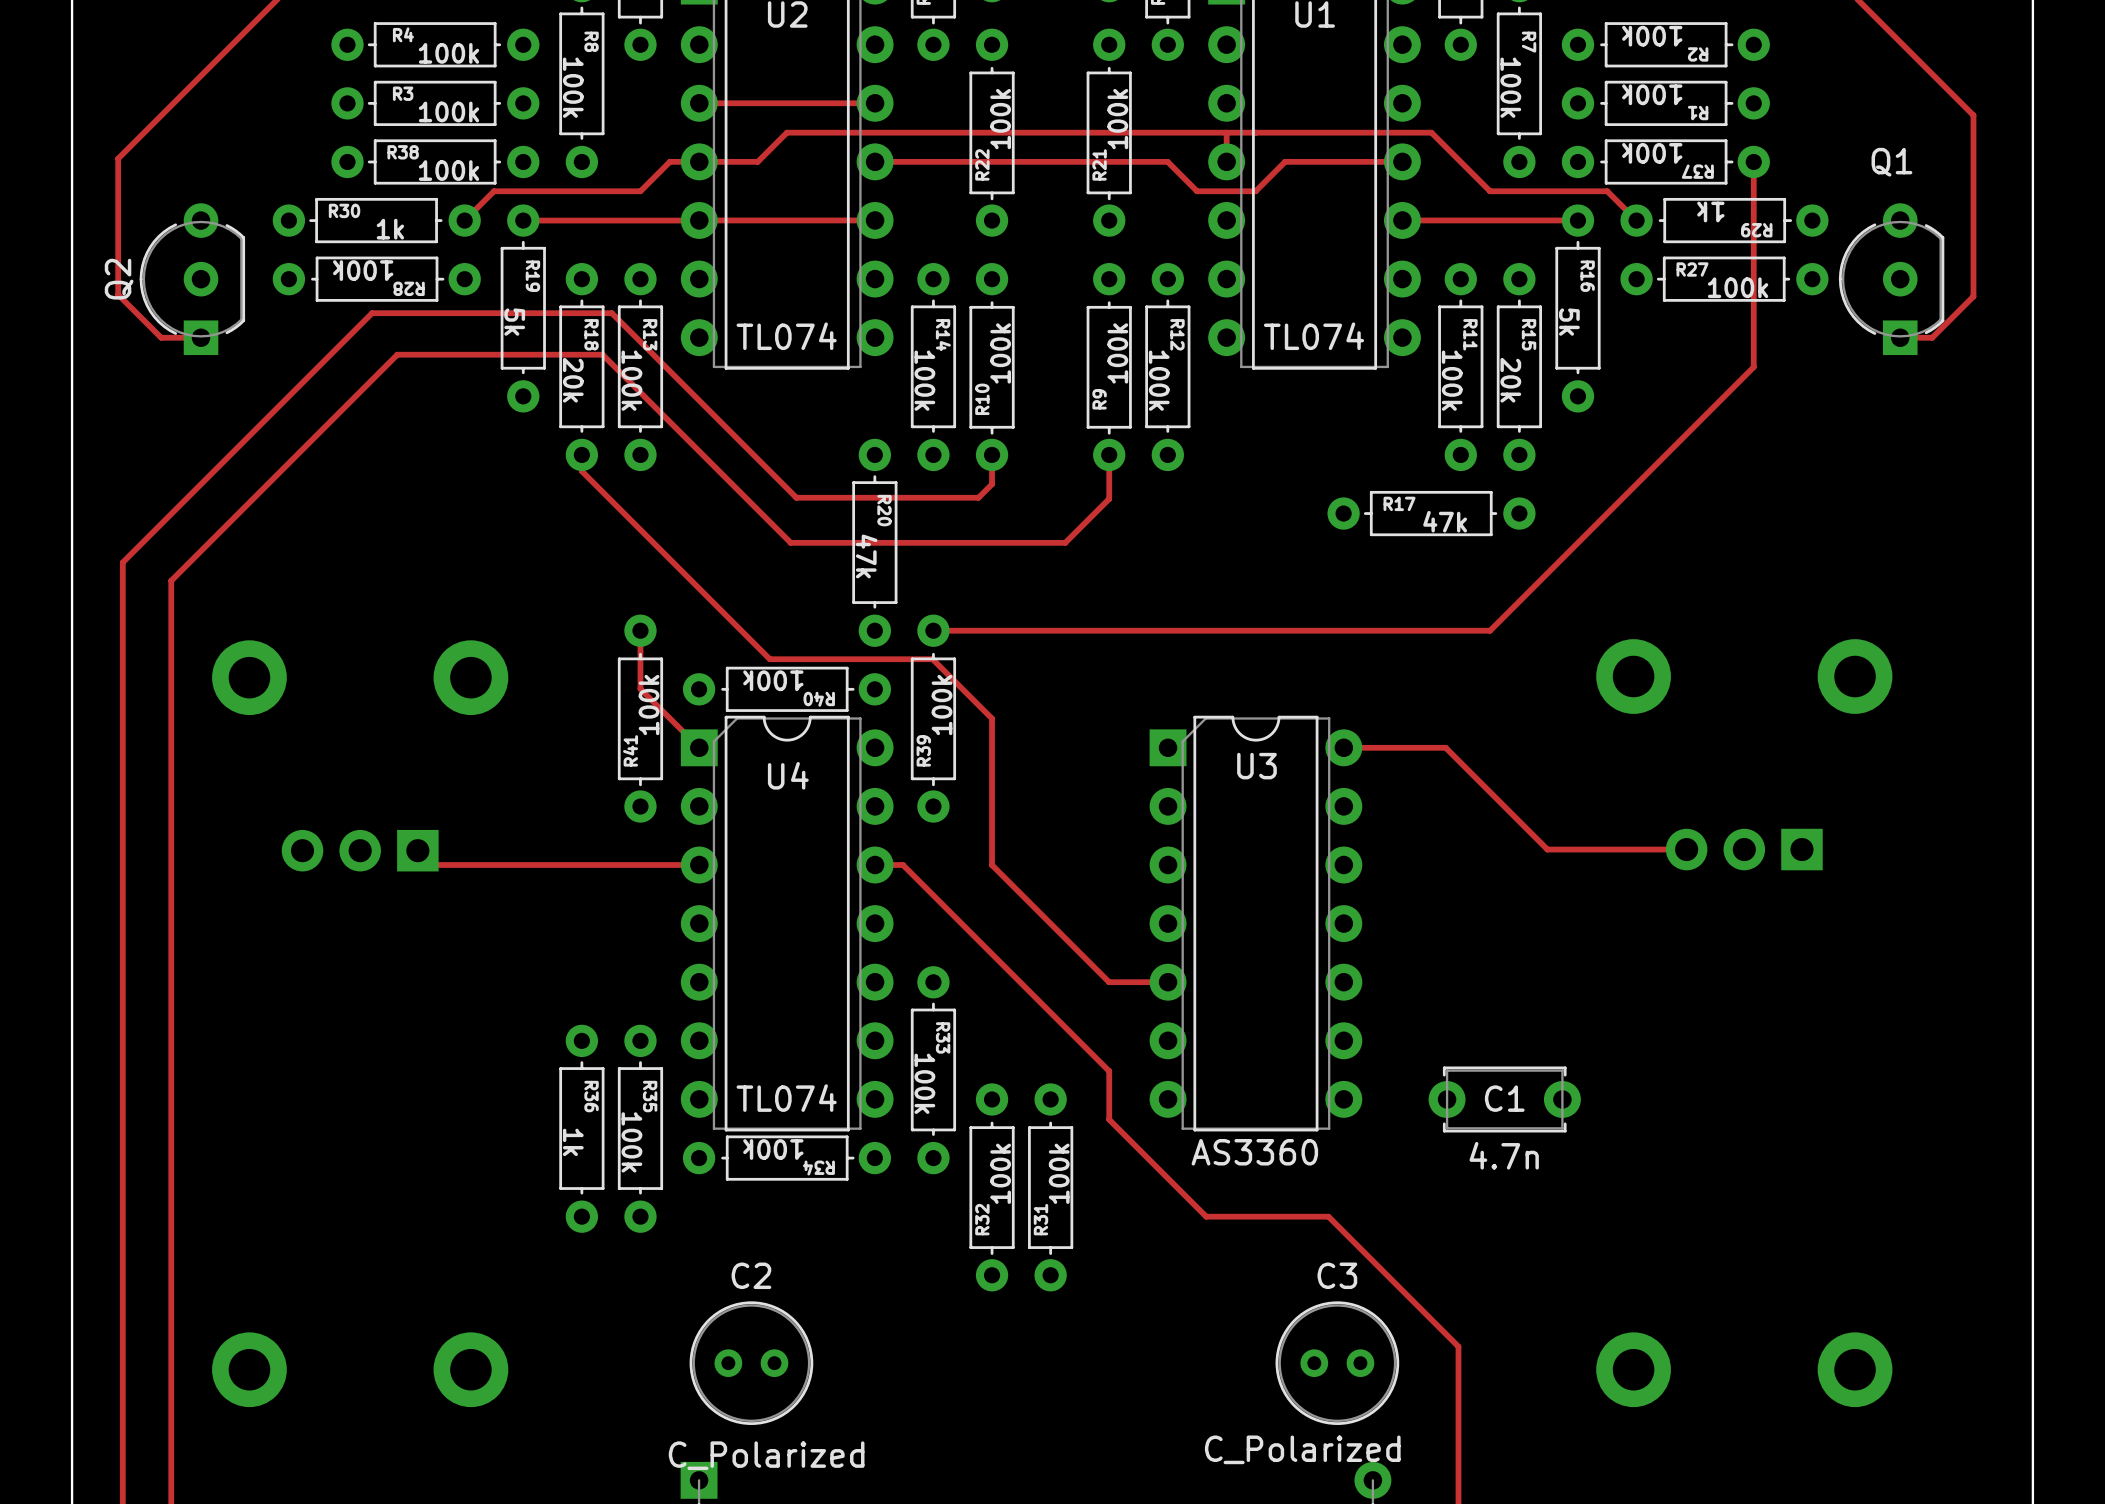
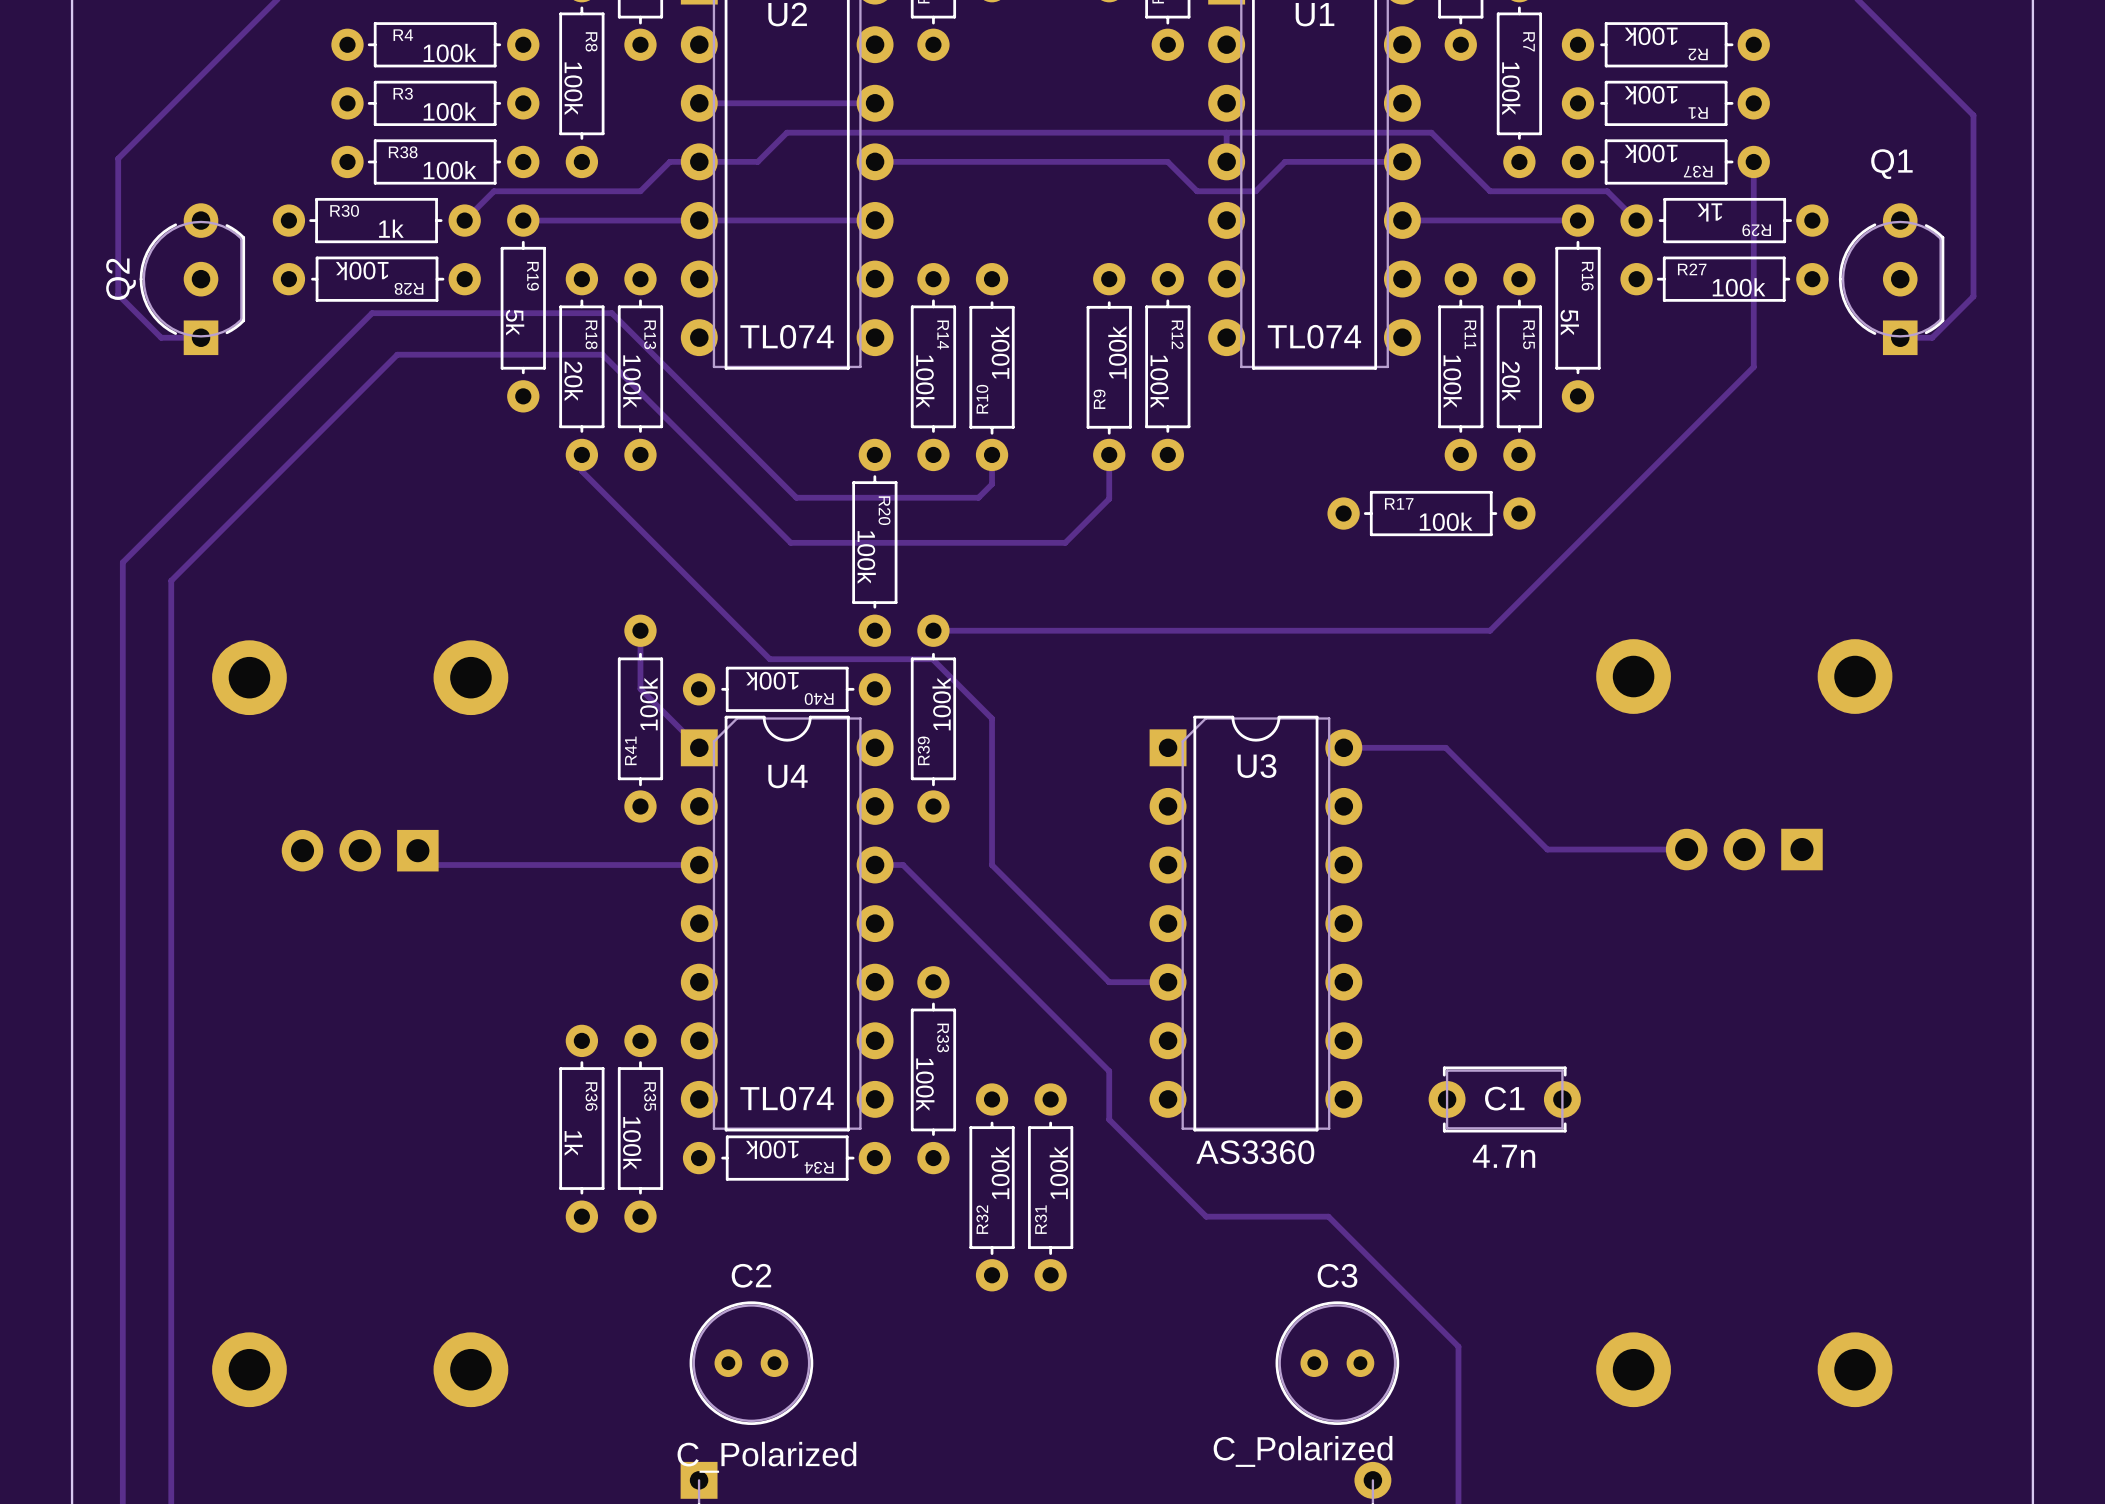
R22: 100k (992, 132) -> none
R21: 100k (1109, 132) -> none
R17 value: 47k (1445, 521) -> 100k (1446, 521)
R20 value: 47k (866, 556) -> 100k (866, 557)

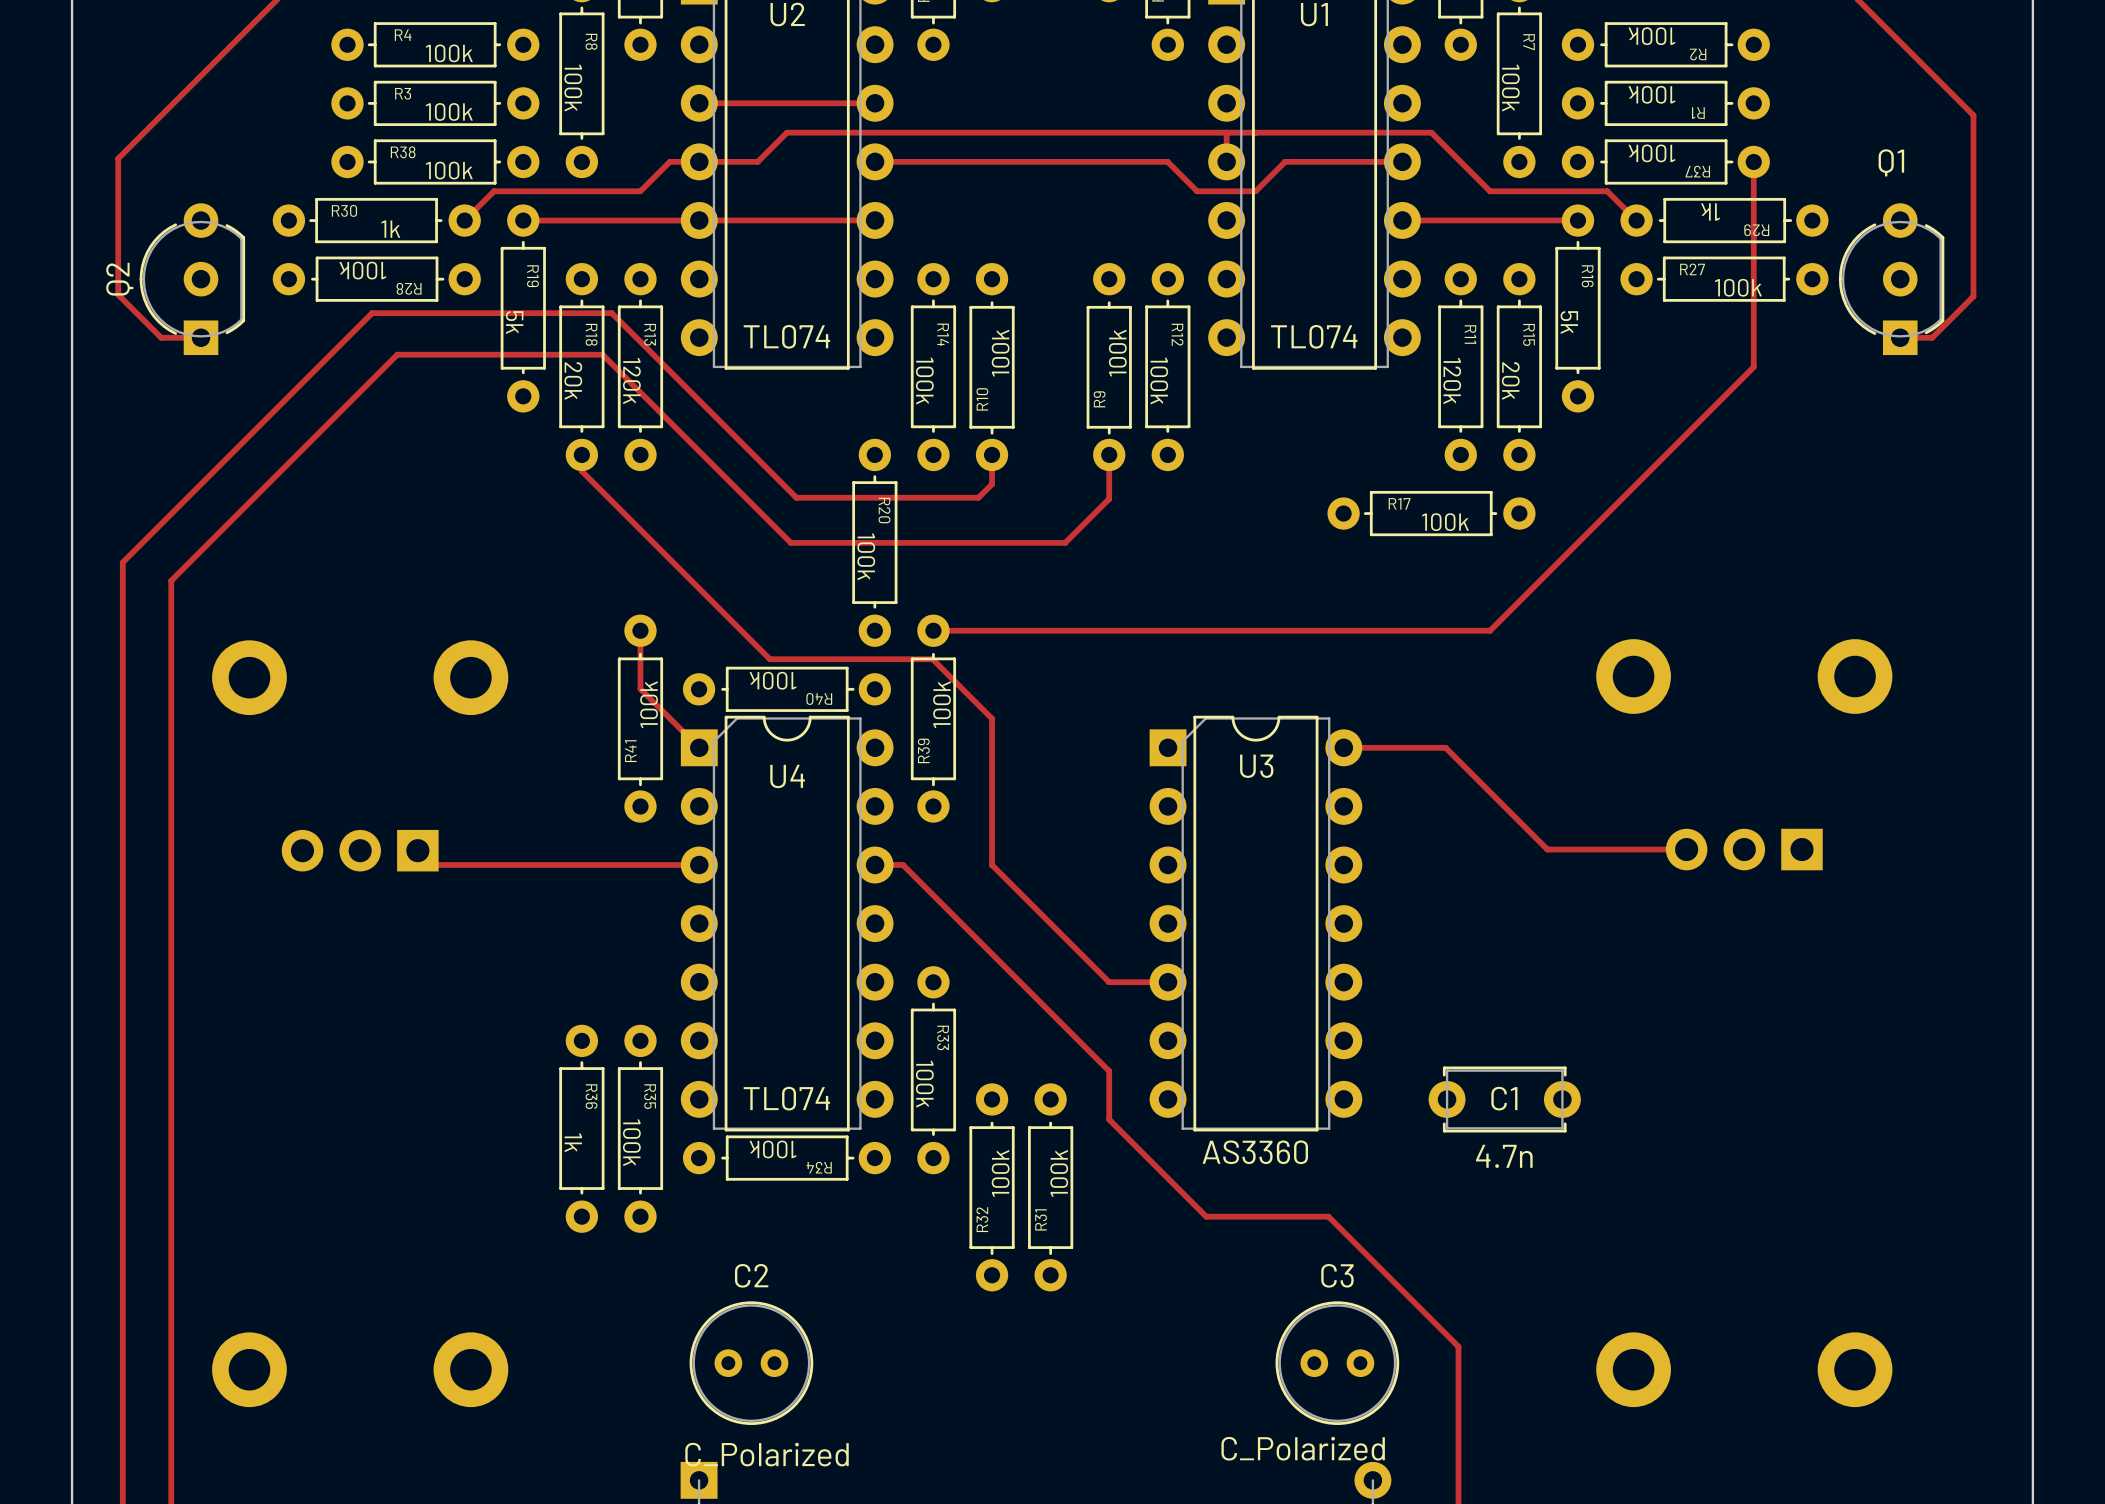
R13 value: 100k (632, 381) -> 120k (631, 381)
R11 value: 100k (1452, 381) -> 120k (1452, 381)

